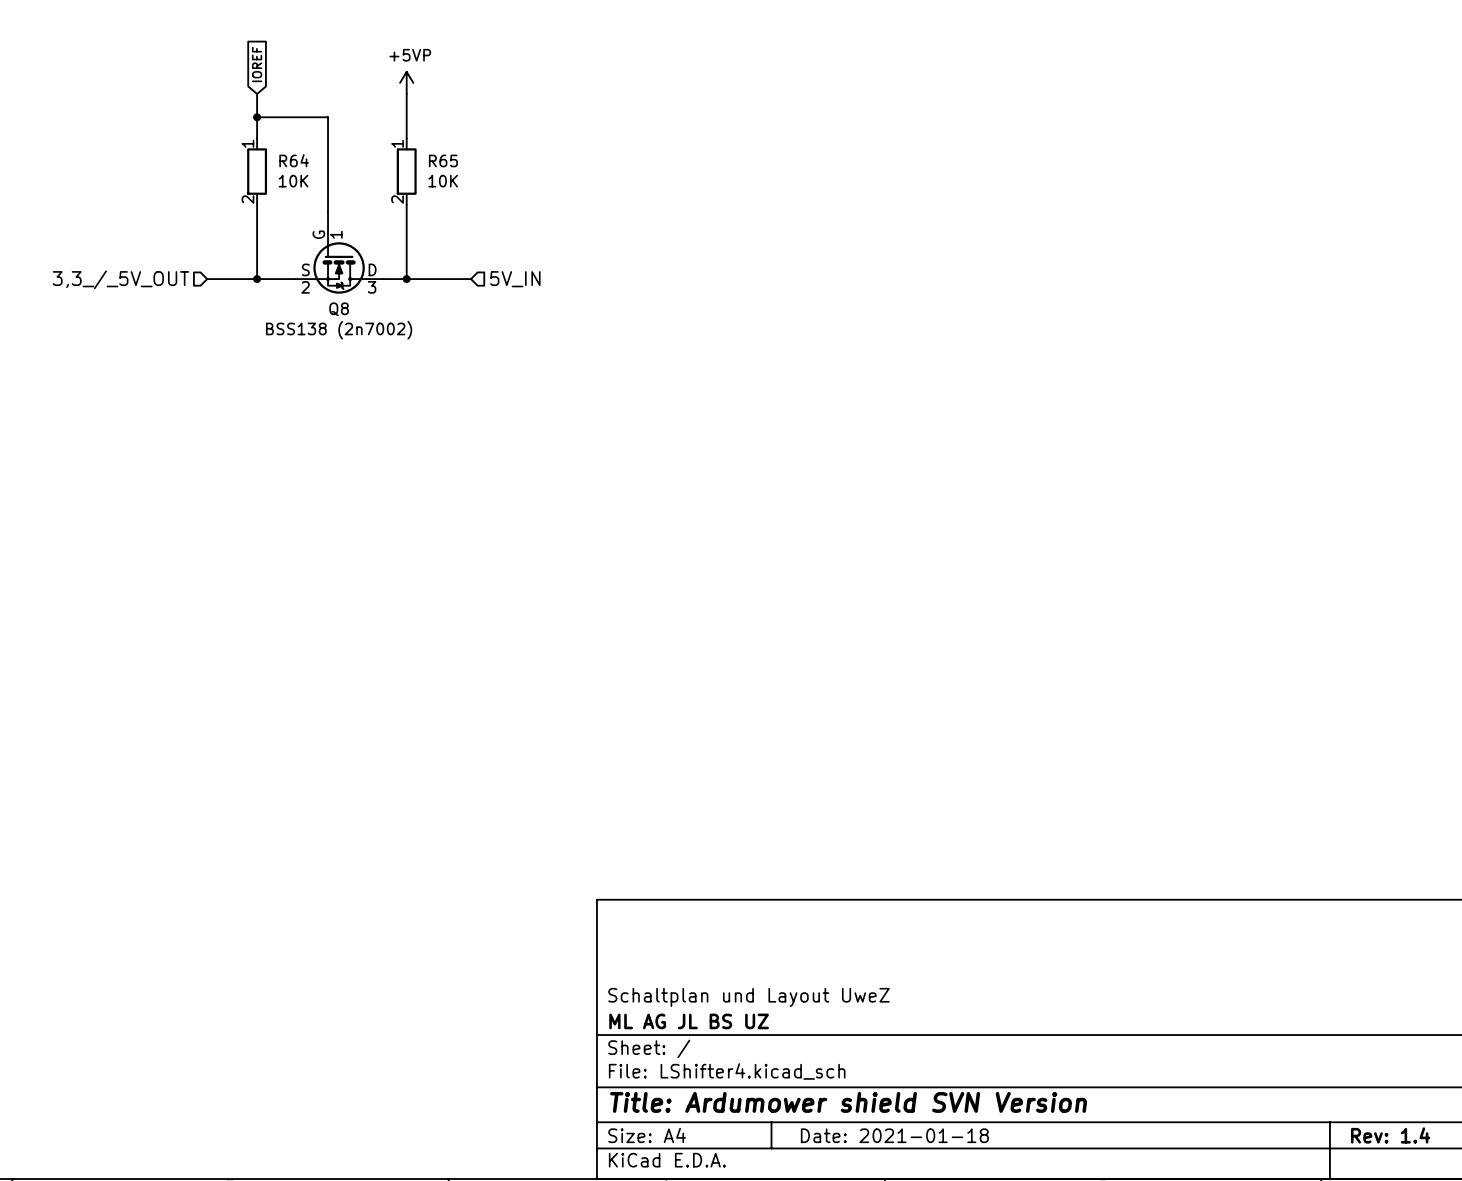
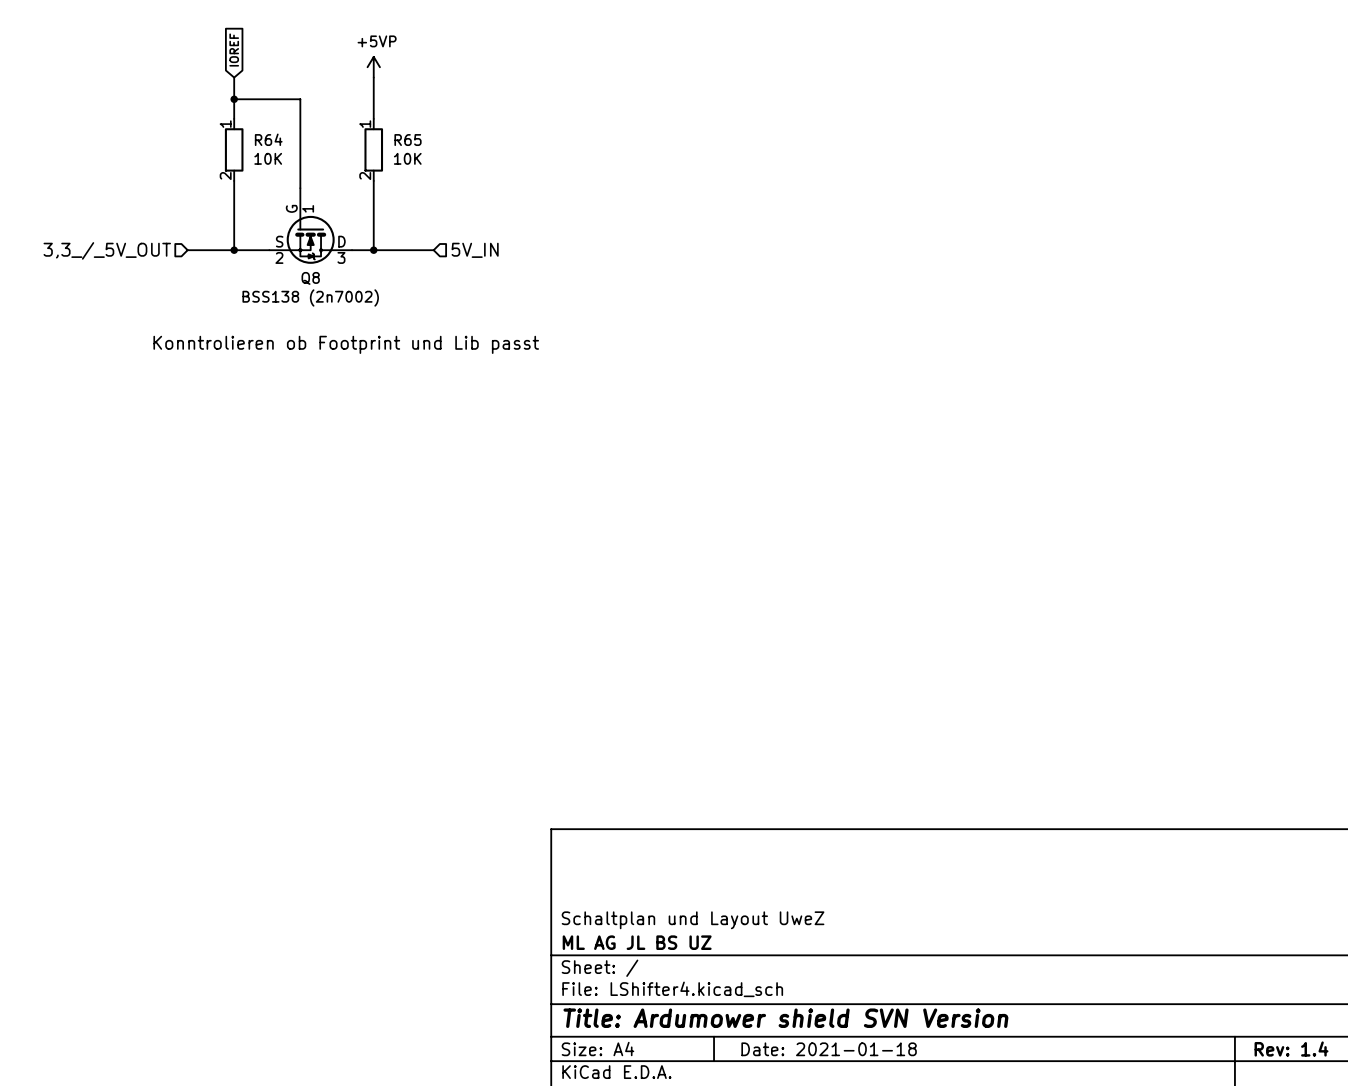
text: none -> Konntrolieren ob Footprint und Lib passt (346, 344)

